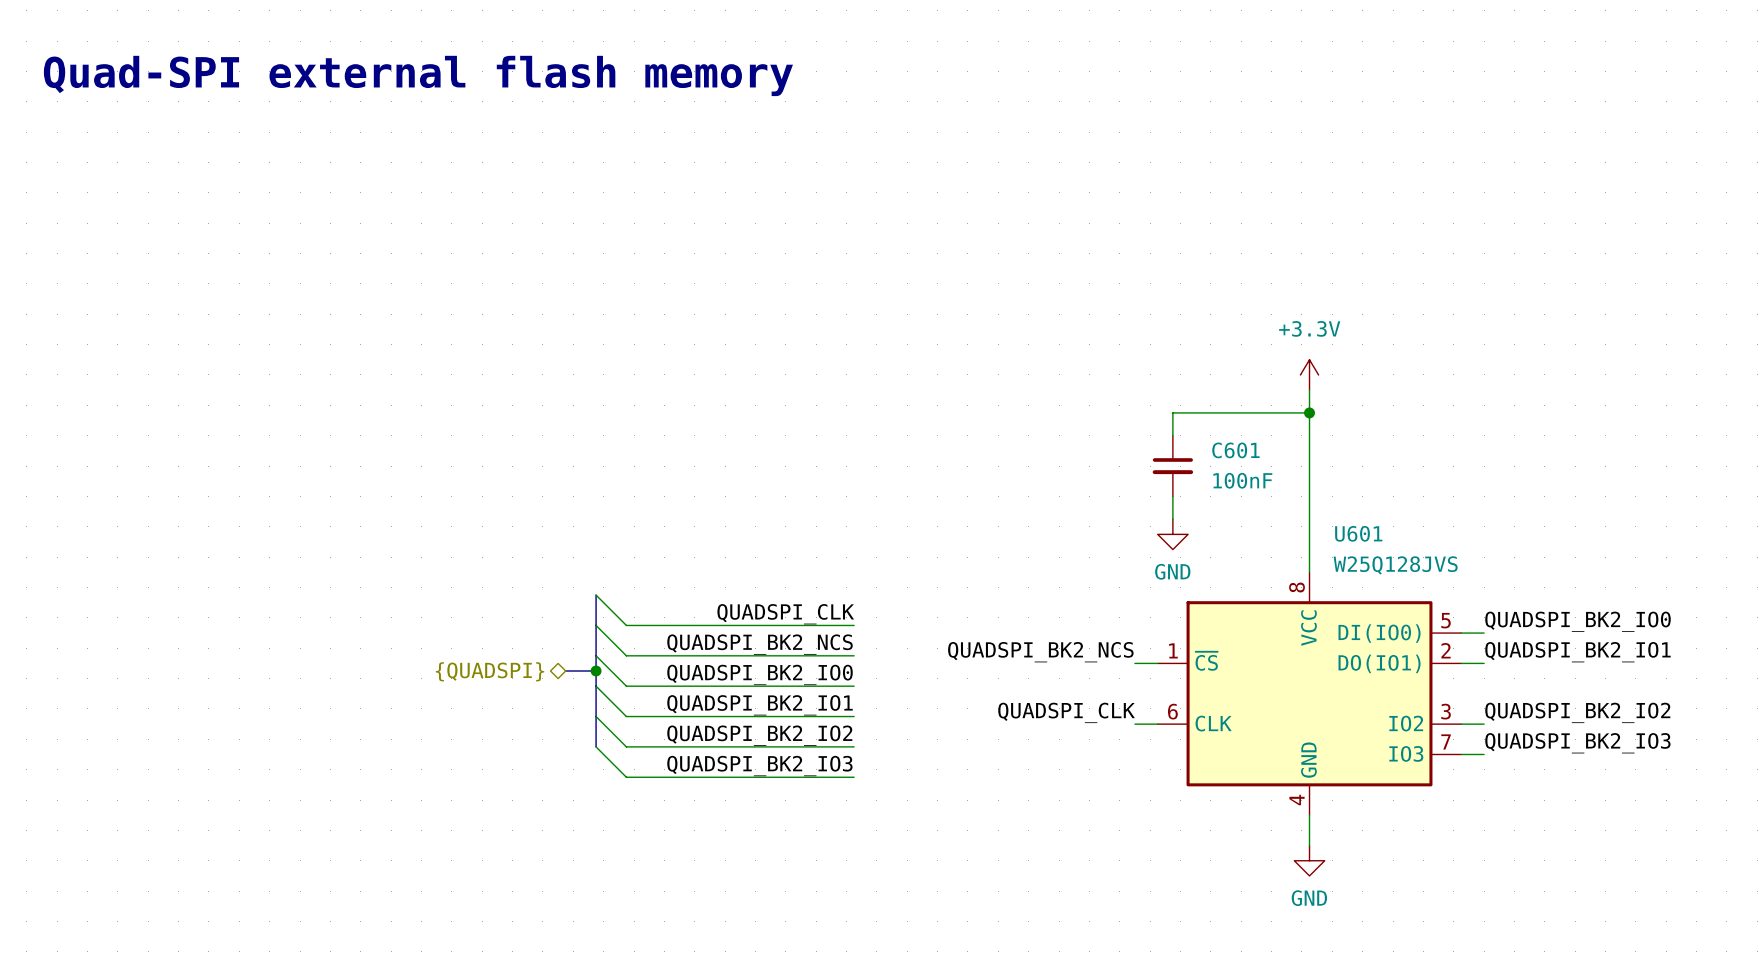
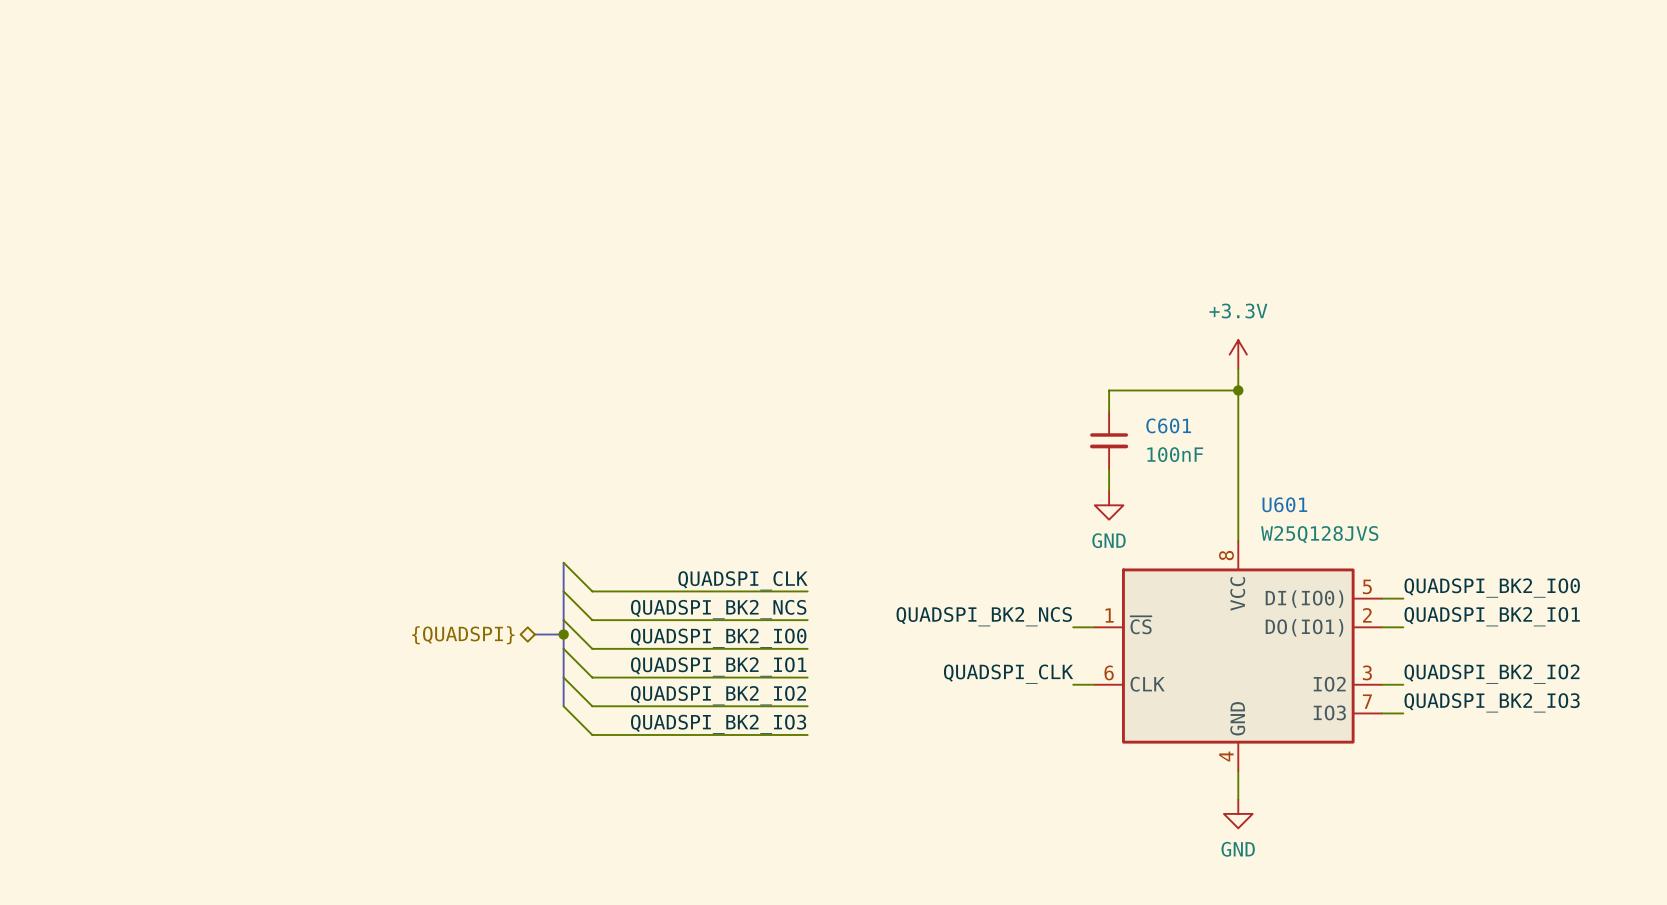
text: Quad-SPI external flash memory (418, 75) -> none

